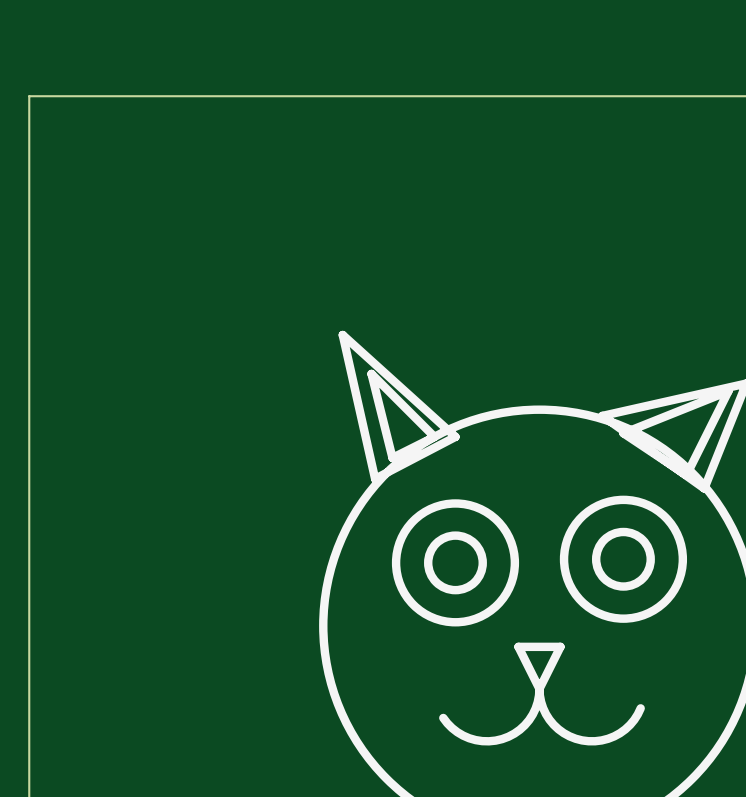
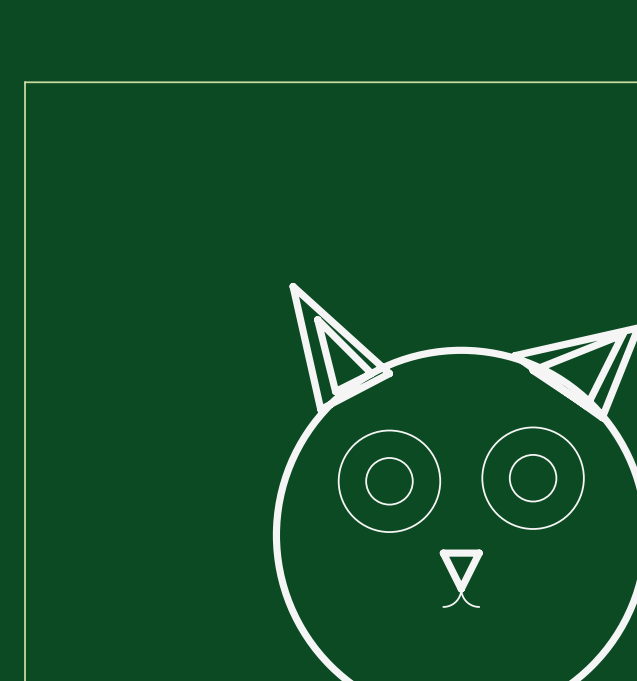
drawing: [391, 495, 688, 627] -> none
drawing: none -> [337, 426, 585, 533]
line: (640, 708) (634, 719) (619, 733) (608, 738) (595, 741) (582, 740) (569, 736) (553, 724) (543, 708) (539, 688) (535, 708) (529, 720) (519, 729) (502, 739) (482, 741) (469, 738) (457, 732) (443, 717) -> none
line: none -> (443, 606) (456, 601) (461, 589) (466, 601) (479, 606)

